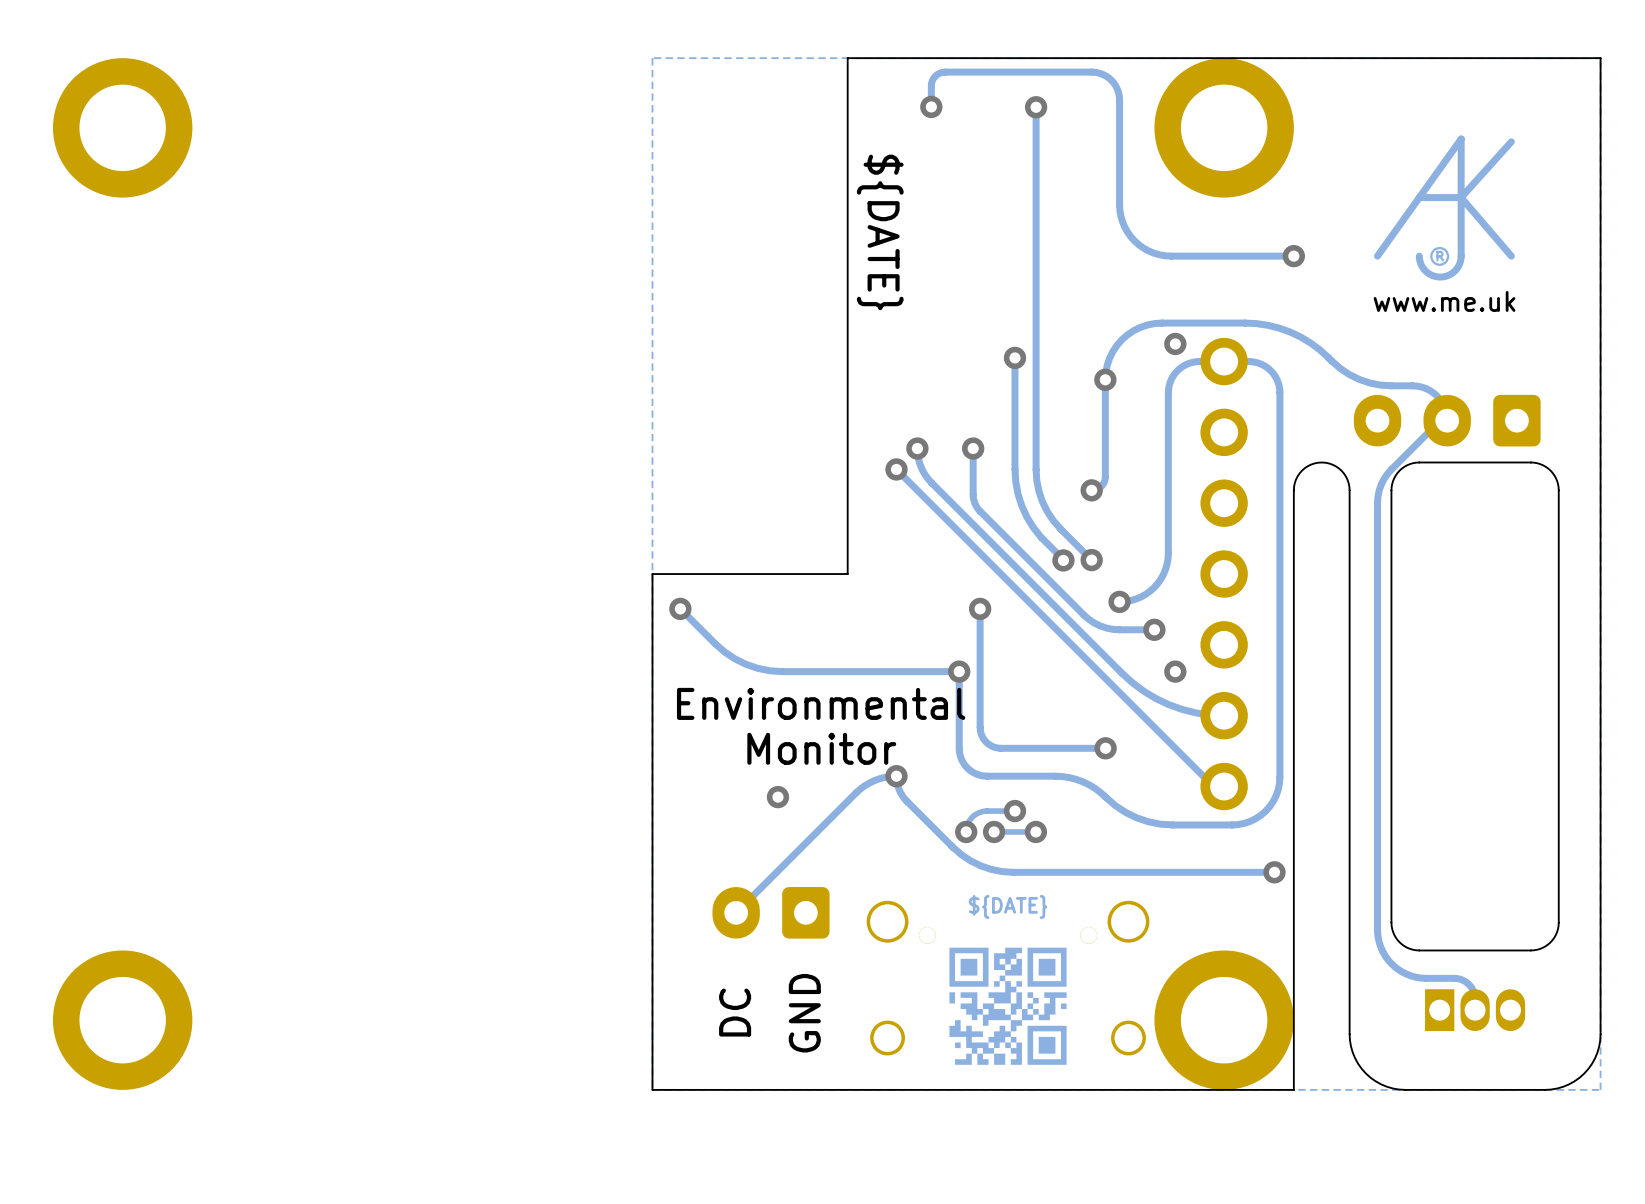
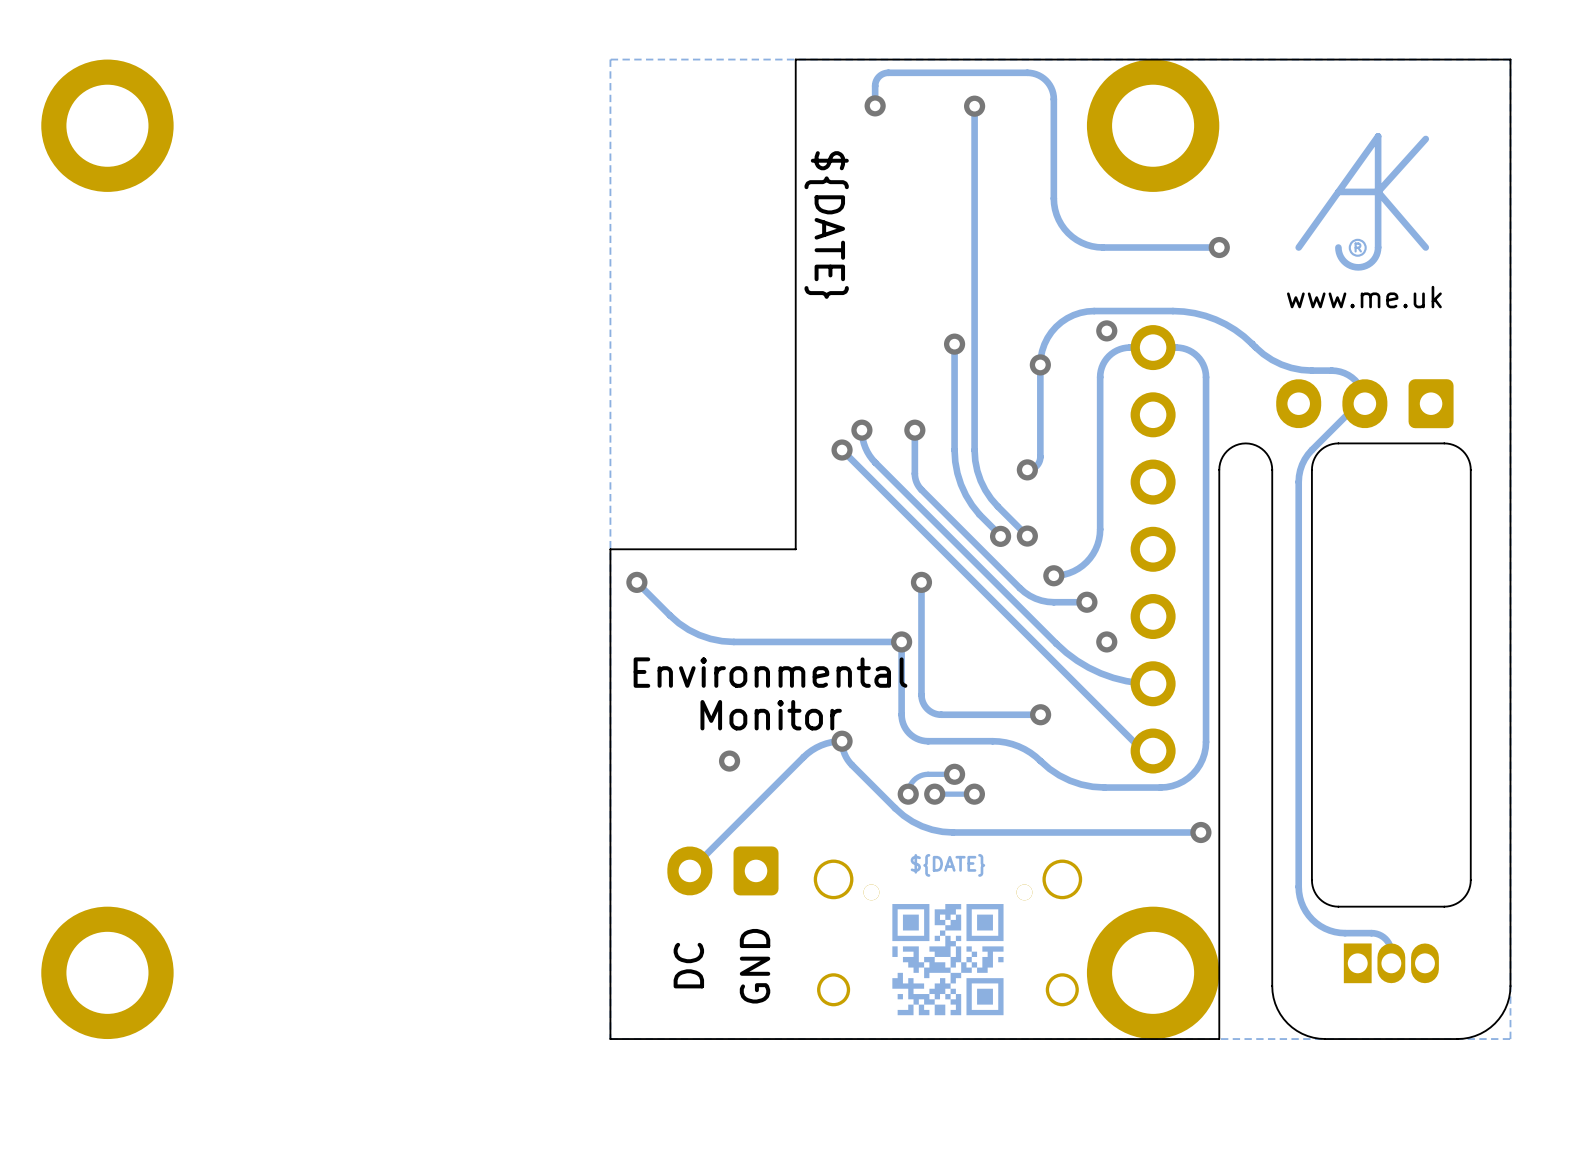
drawing shape: [1373, 135, 1516, 312] -> [1295, 133, 1430, 271]
text: none -> www.me.uk (1364, 297)

